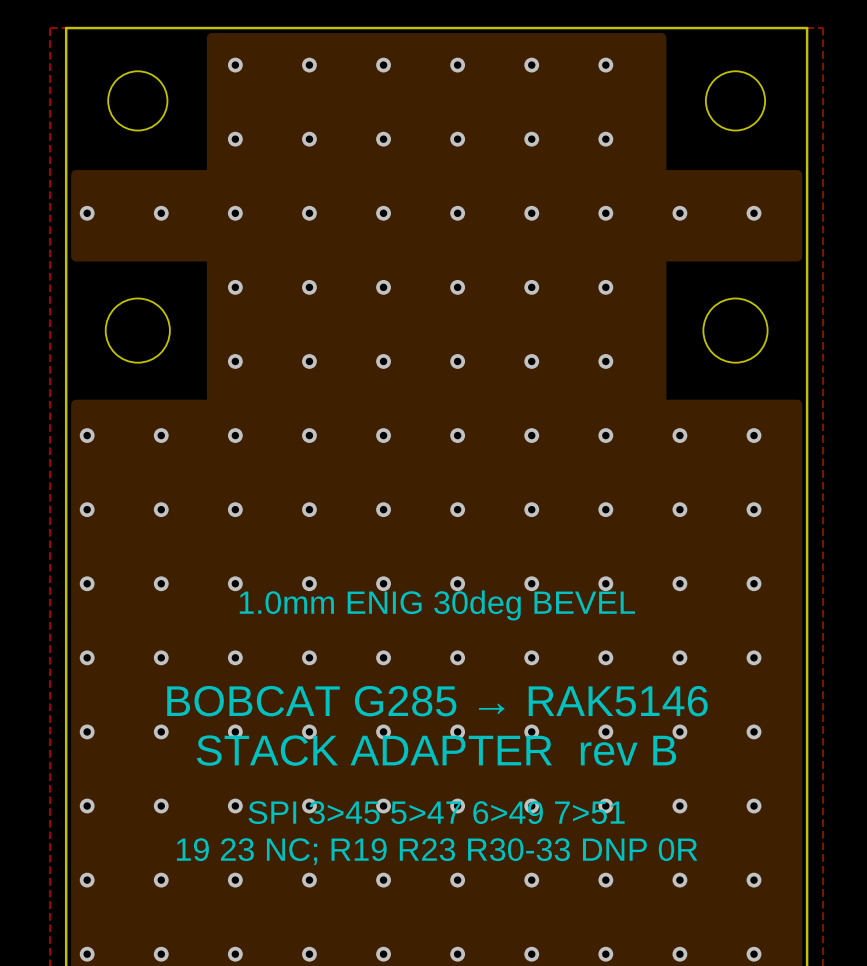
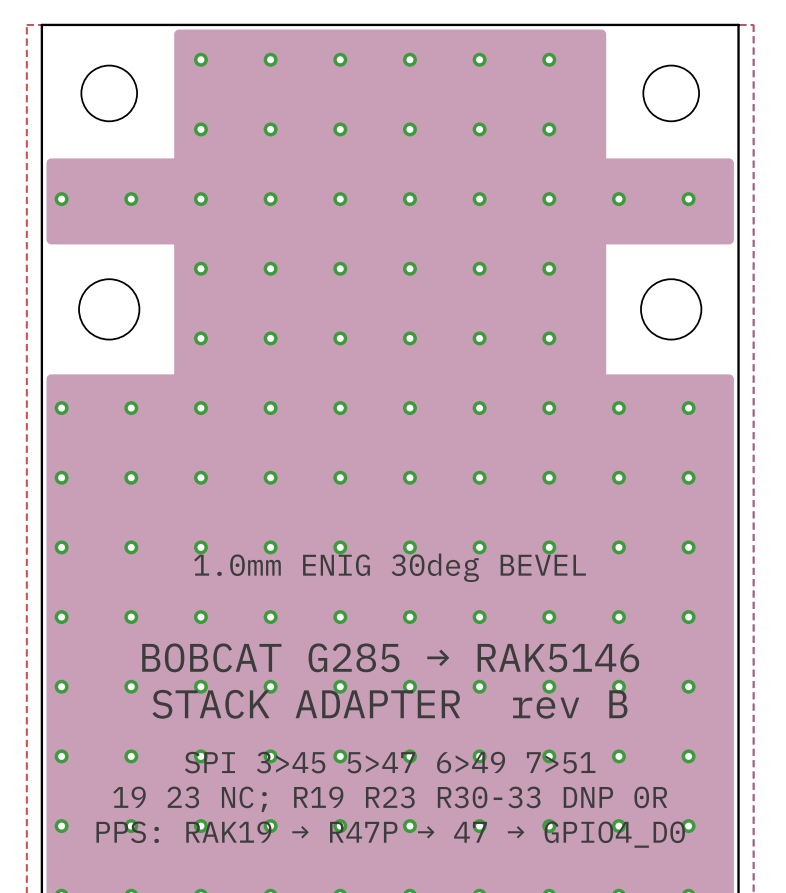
text: none -> PPS: RAK19 → R47P → 47 → GPIO4_D0 (390, 834)

